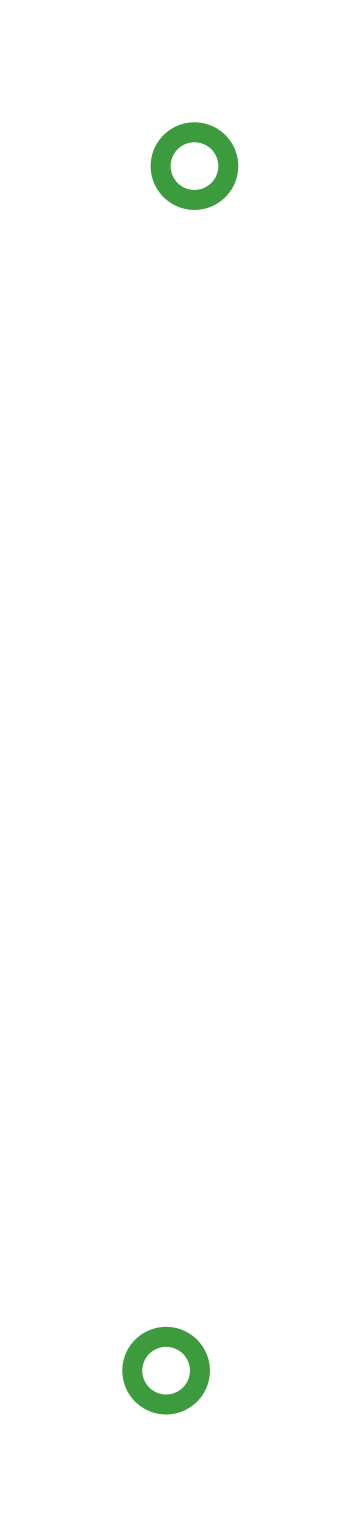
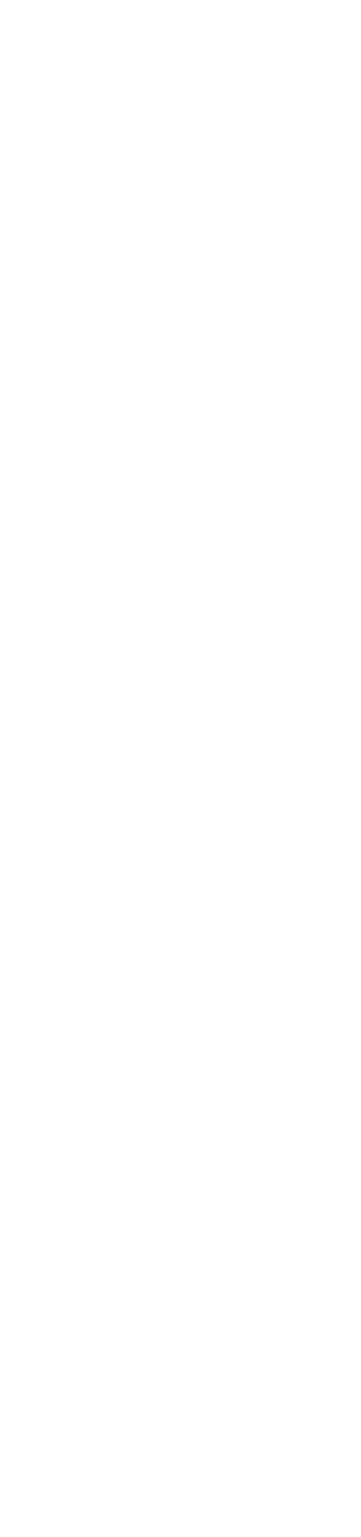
part: (194, 166) -> none
part: (166, 1370) -> none

